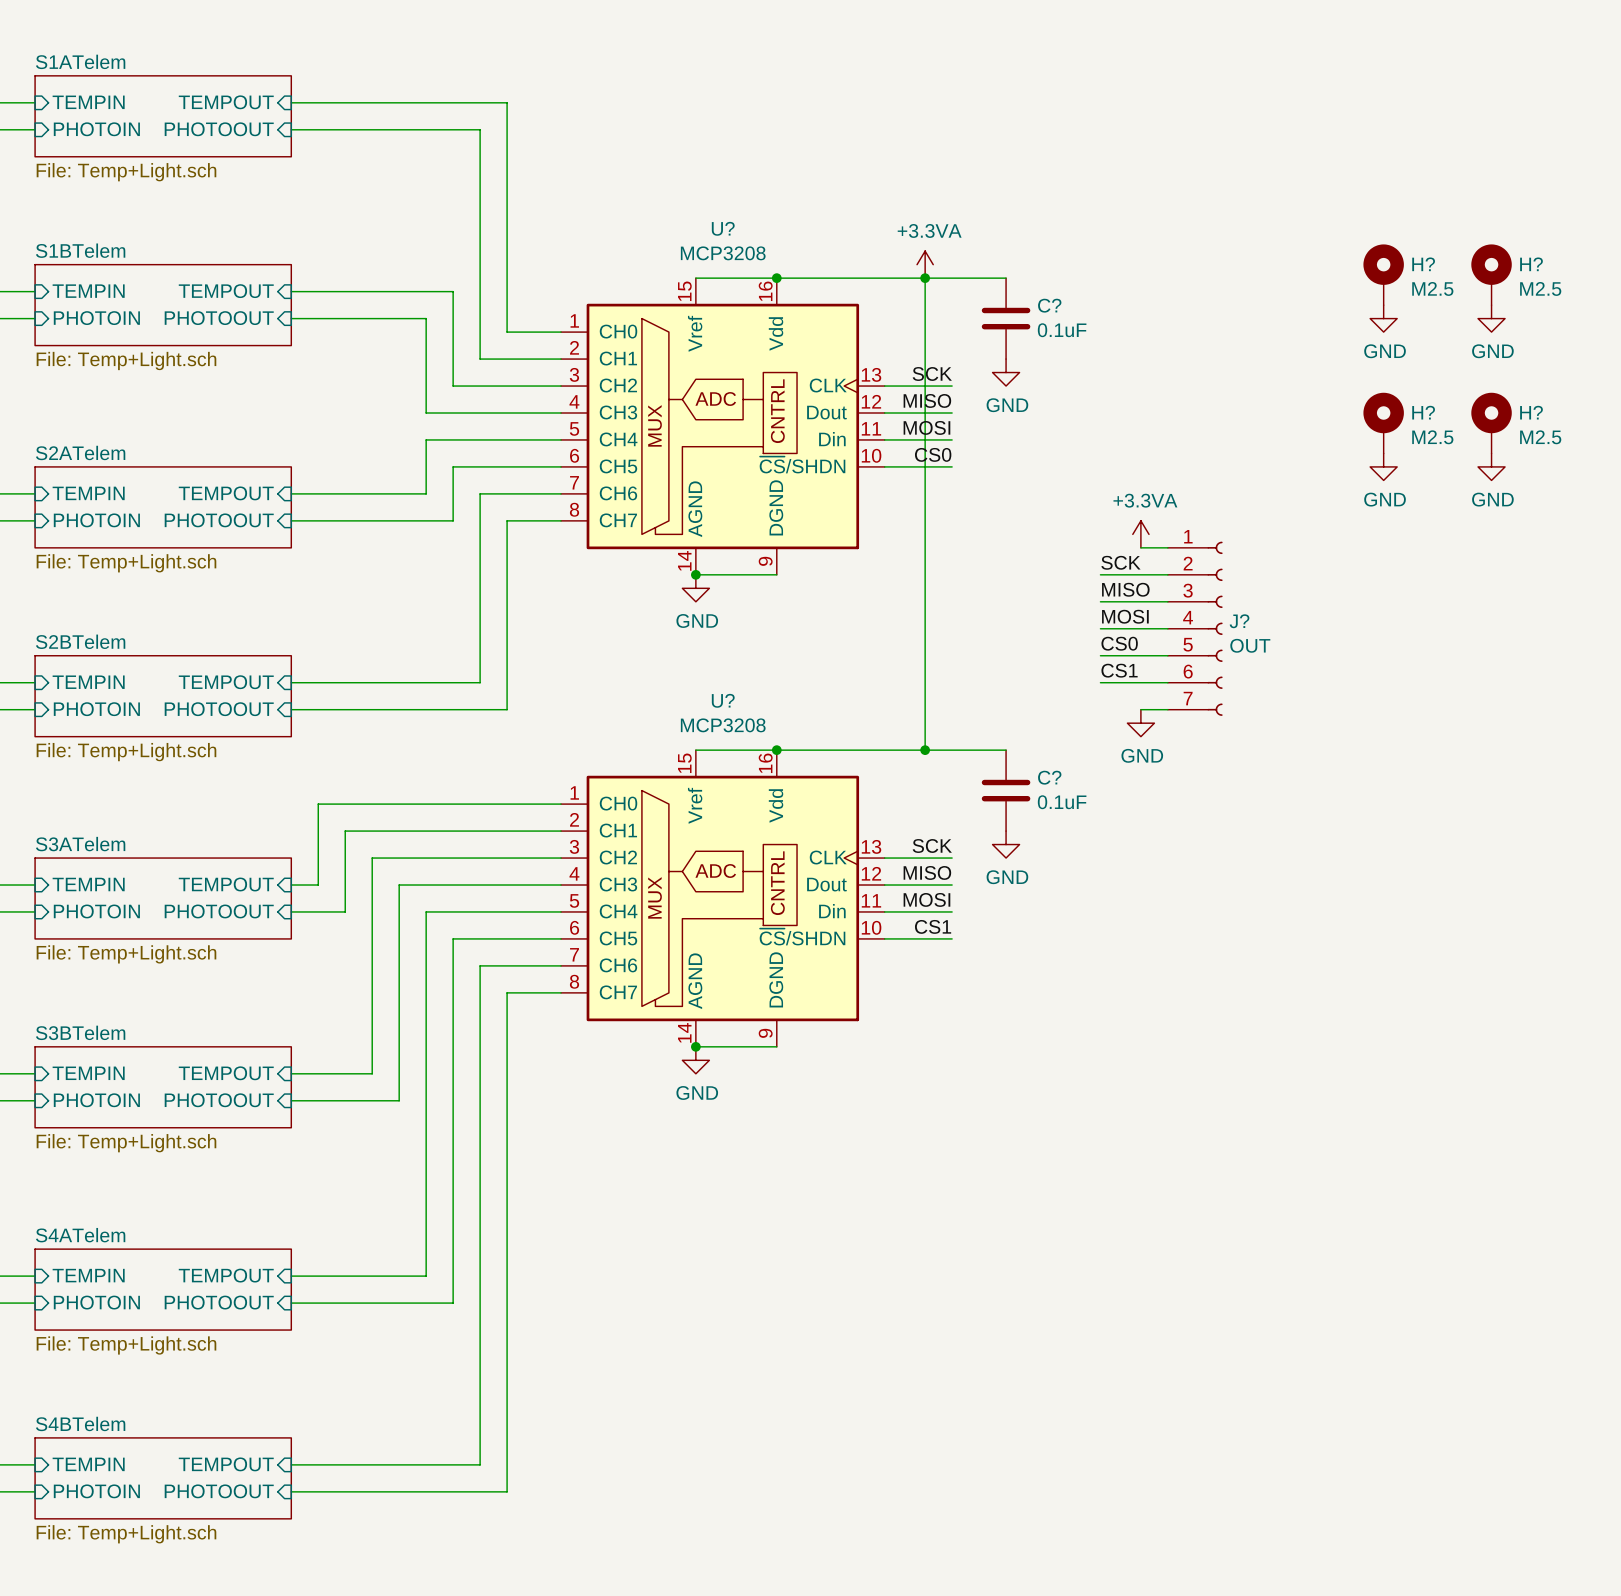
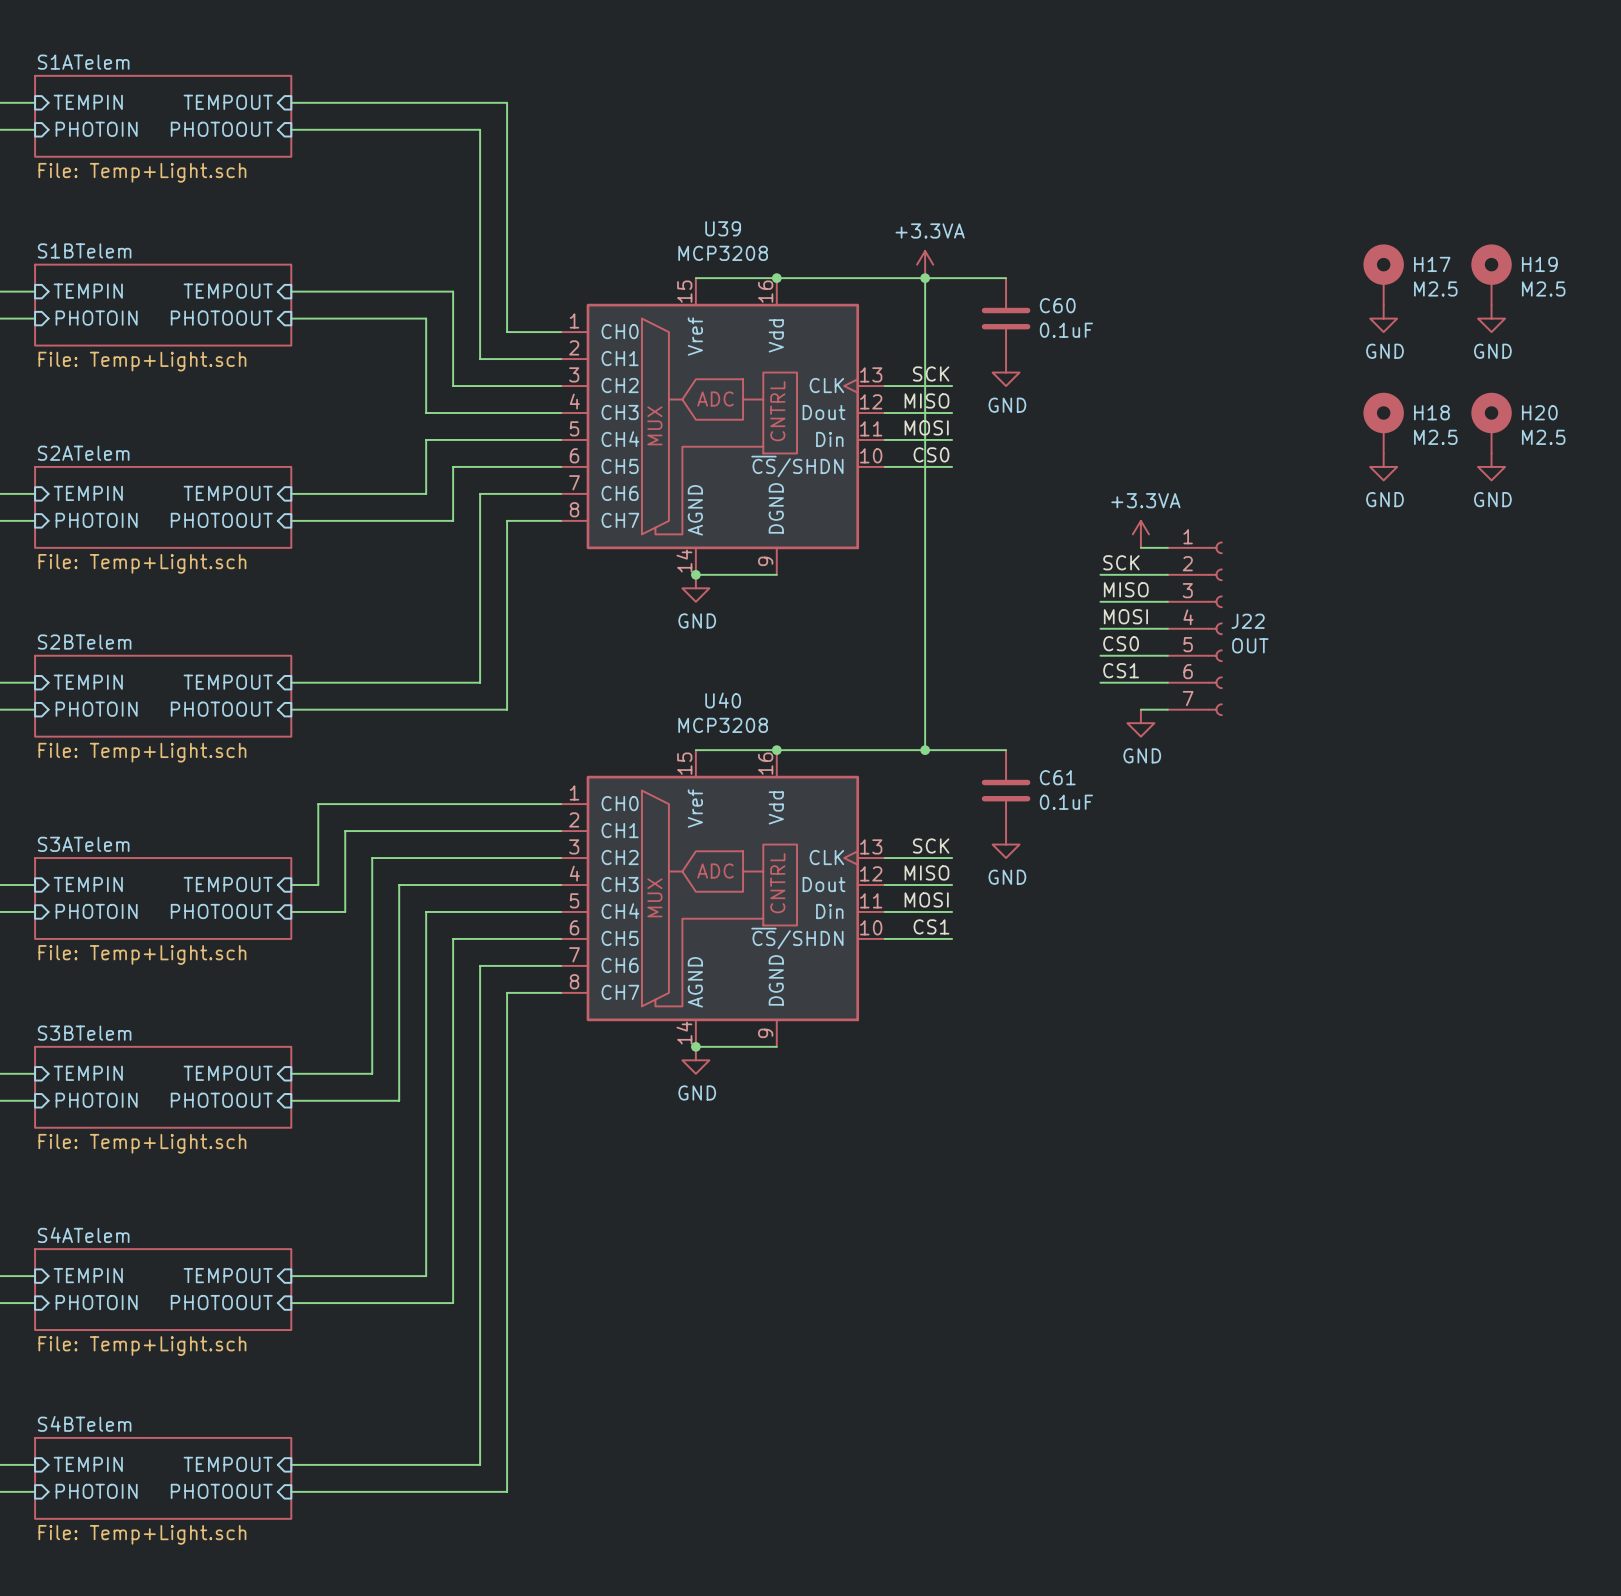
U? name: U? (723, 228) -> U39 (723, 228)
H? name: H? (1423, 264) -> H17 (1432, 264)
H? name: H? (1531, 264) -> H19 (1539, 264)
C? name: C? (1049, 305) -> C60 (1057, 305)
H? name: H? (1423, 412) -> H18 (1431, 412)
H? name: H? (1531, 412) -> H20 (1539, 412)
J? name: J? (1239, 621) -> J22 (1248, 621)
U? name: U? (723, 700) -> U40 (723, 700)
C? name: C? (1049, 777) -> C61 (1057, 777)

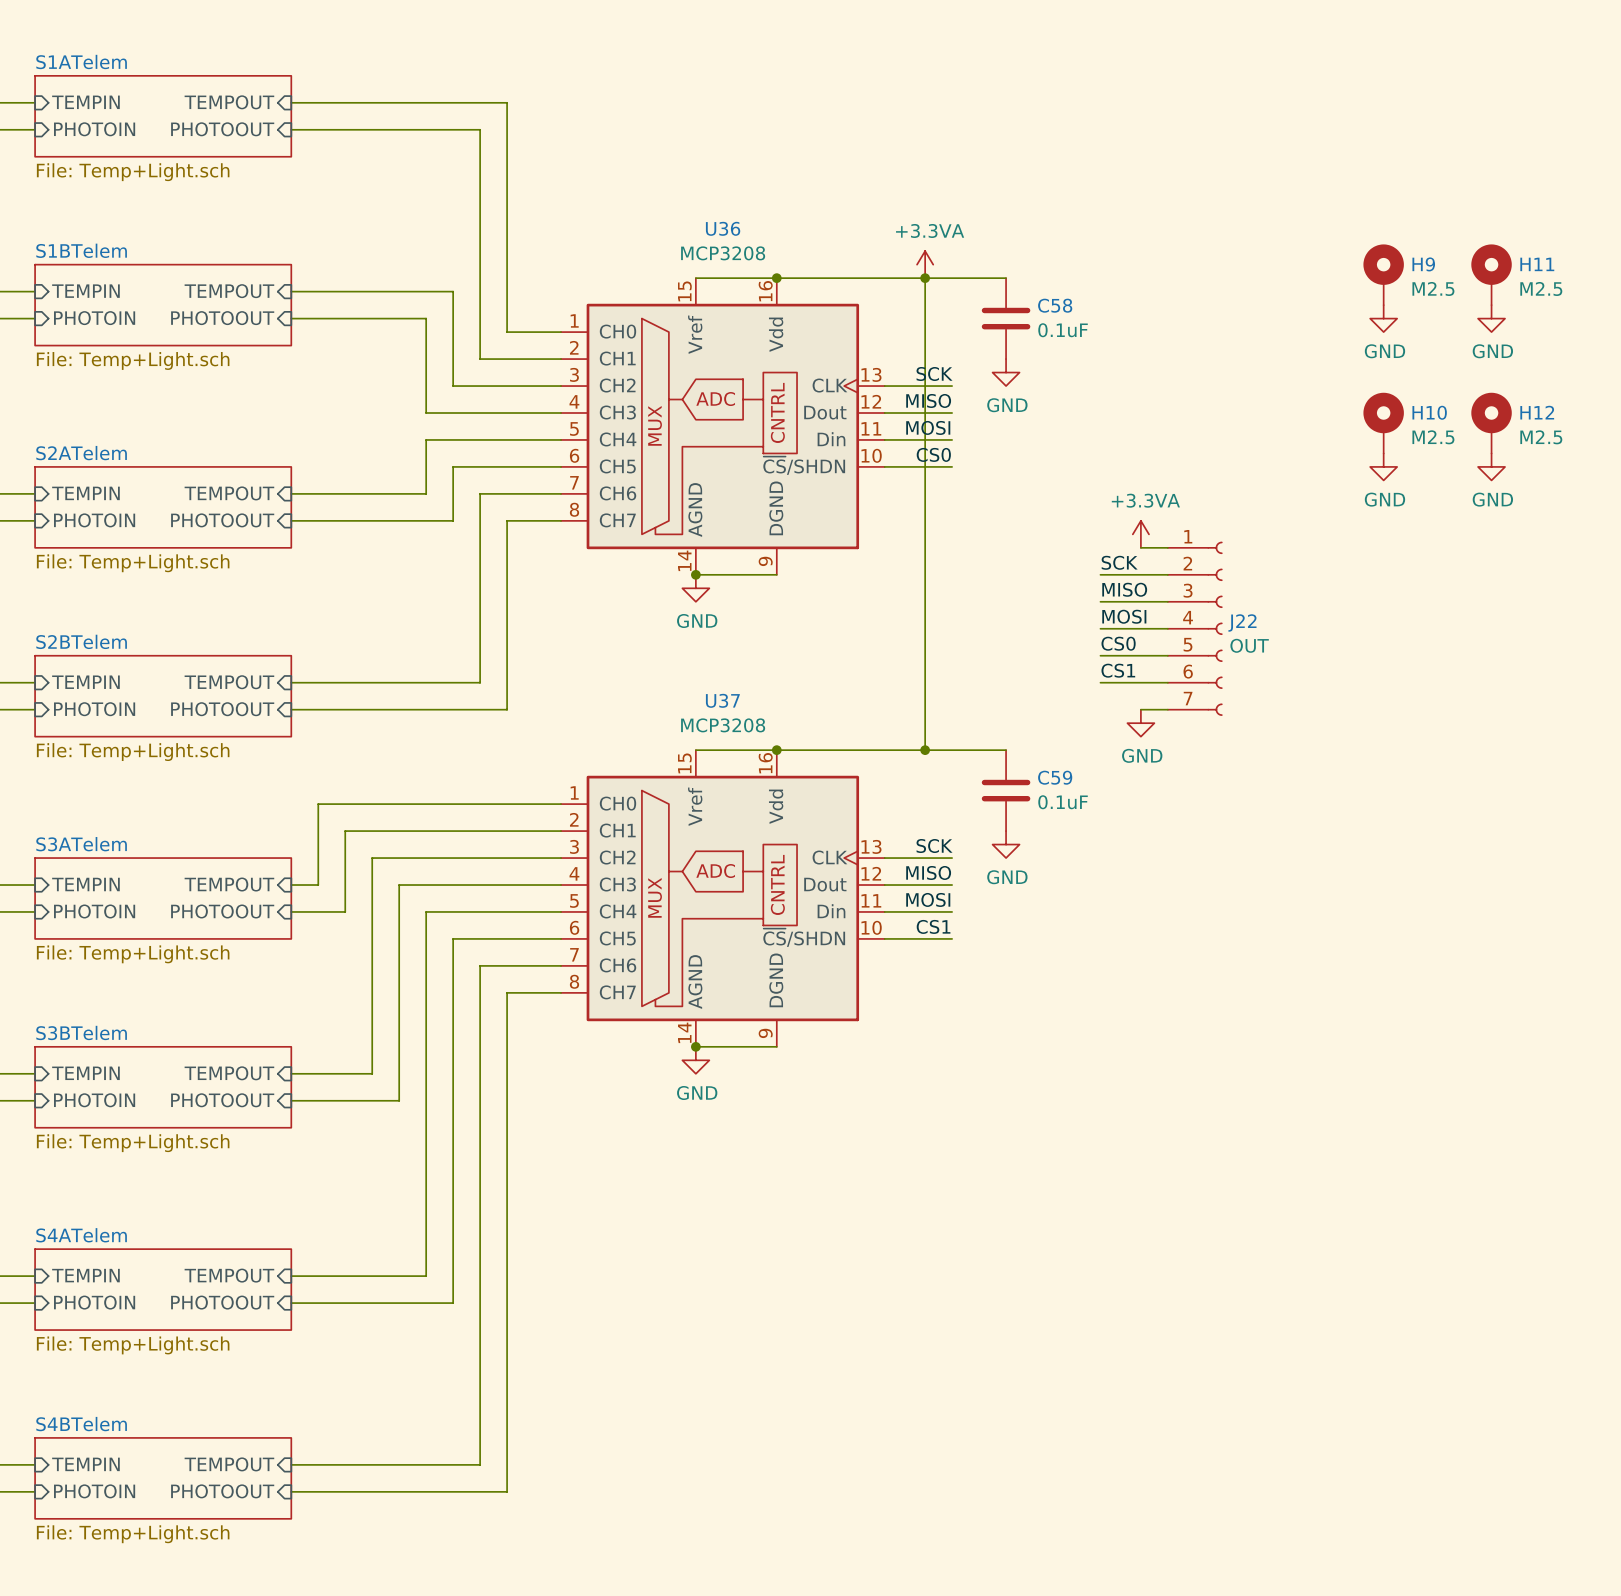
U39 name: U39 (723, 228) -> U36 (723, 228)
H17 name: H17 (1432, 264) -> H9 (1423, 264)
H19 name: H19 (1539, 264) -> H11 (1537, 264)
C60 name: C60 (1057, 305) -> C58 (1055, 305)
H18 name: H18 (1431, 412) -> H10 (1429, 412)
H20 name: H20 (1539, 412) -> H12 (1537, 412)
U40 name: U40 (723, 700) -> U37 (722, 700)
C61 name: C61 (1057, 777) -> C59 (1055, 777)

